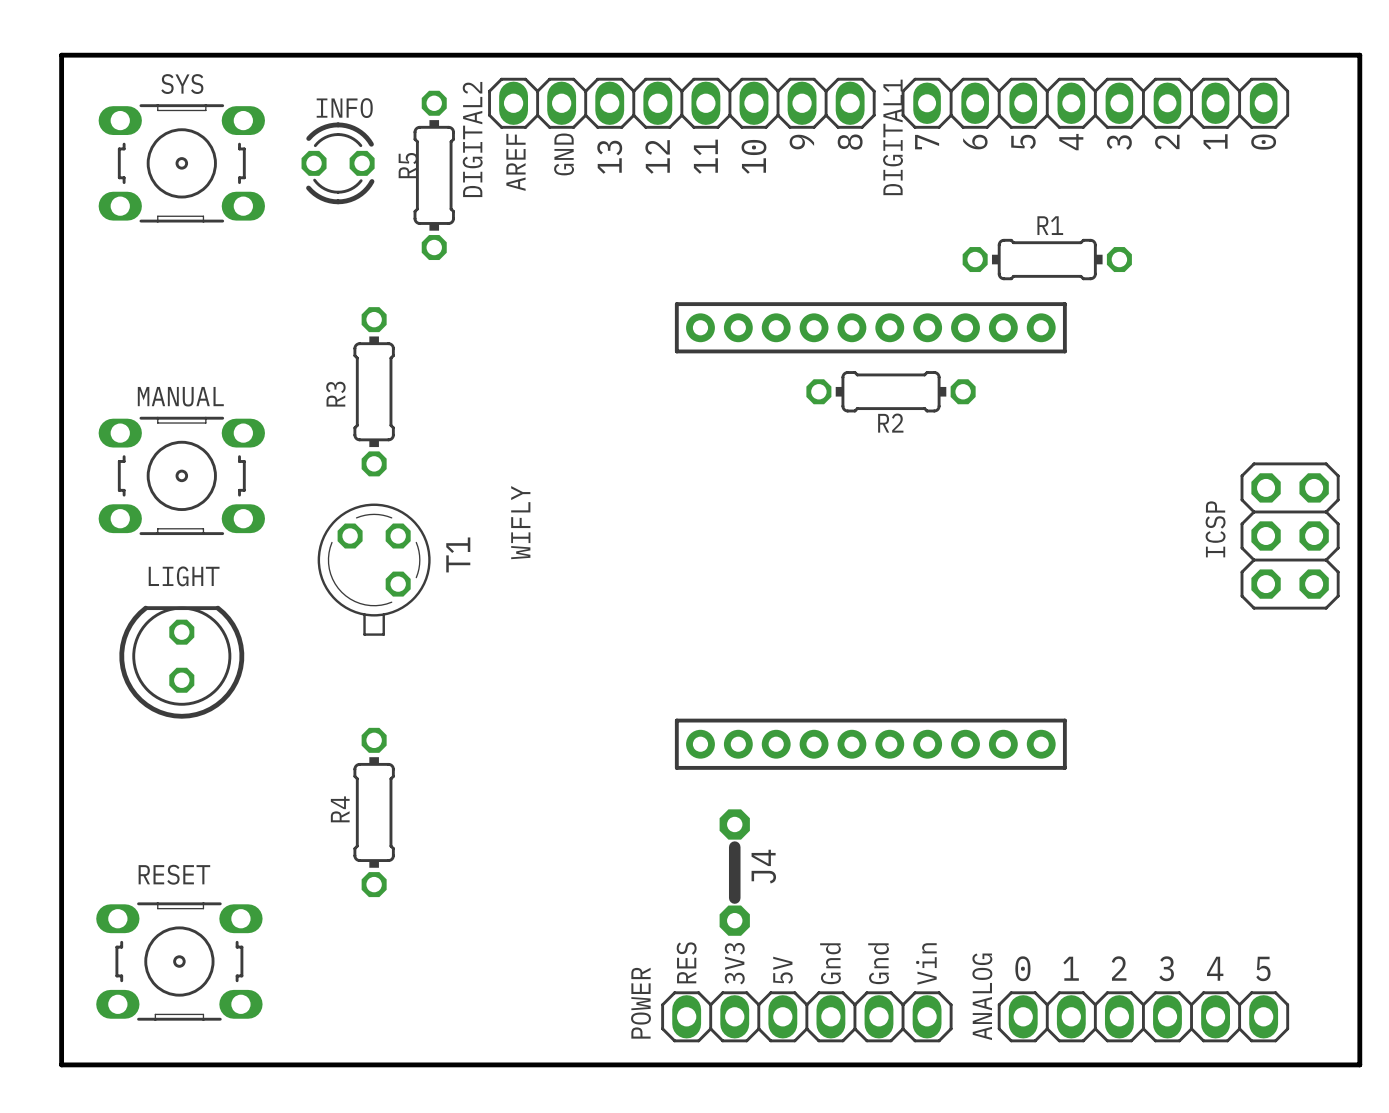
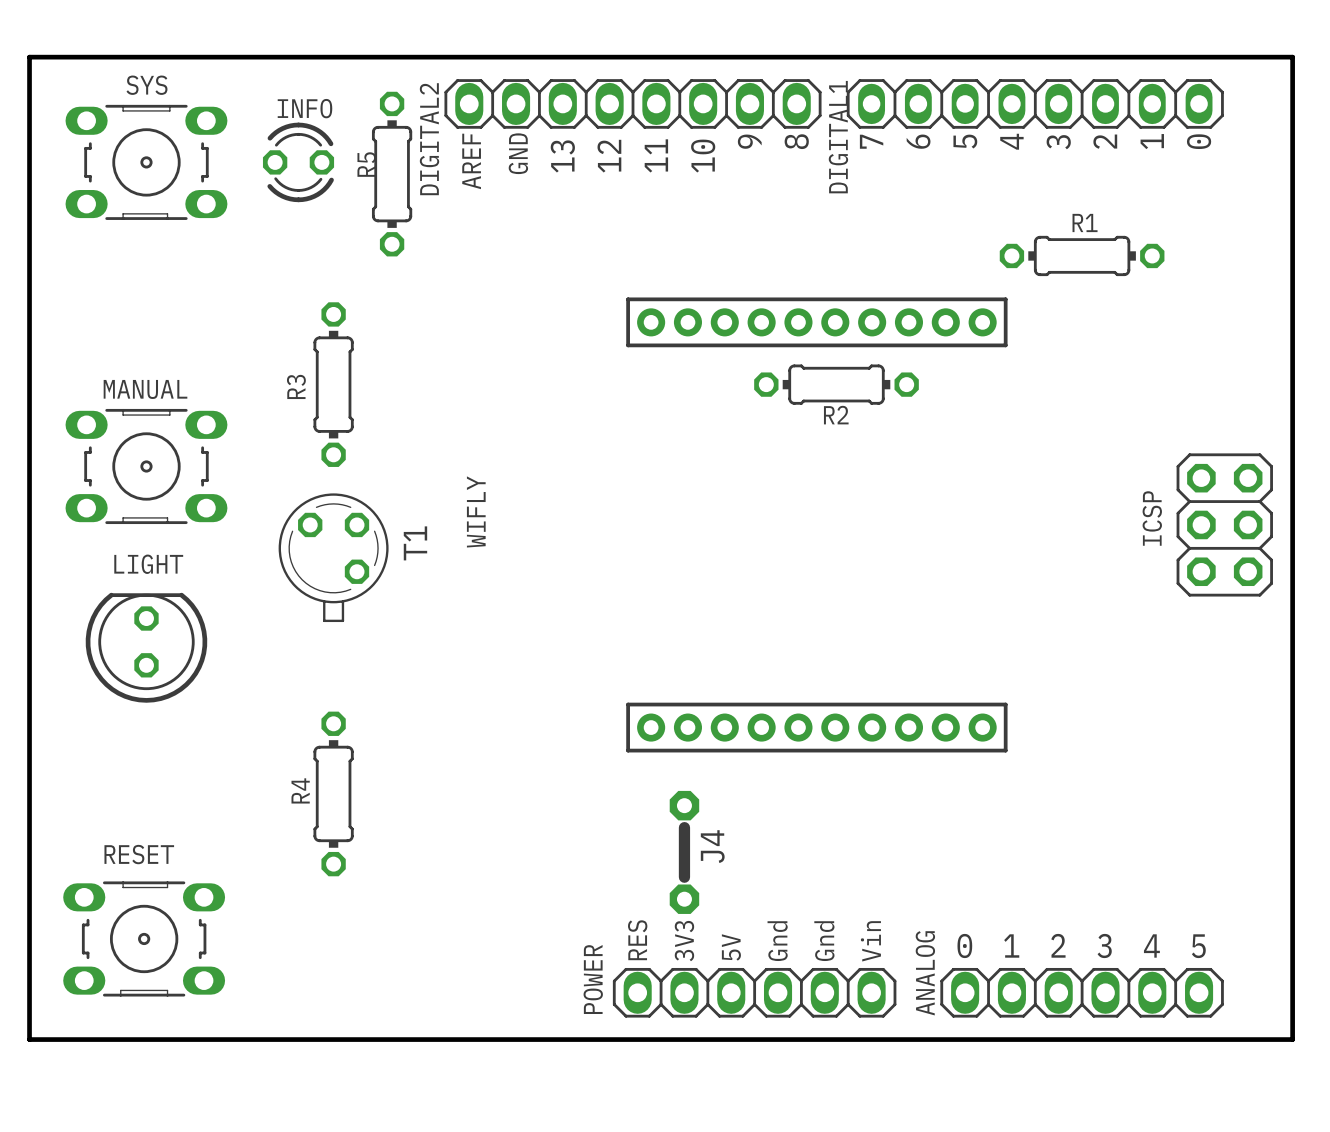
R1 position: (1047, 259) -> (1082, 255)

